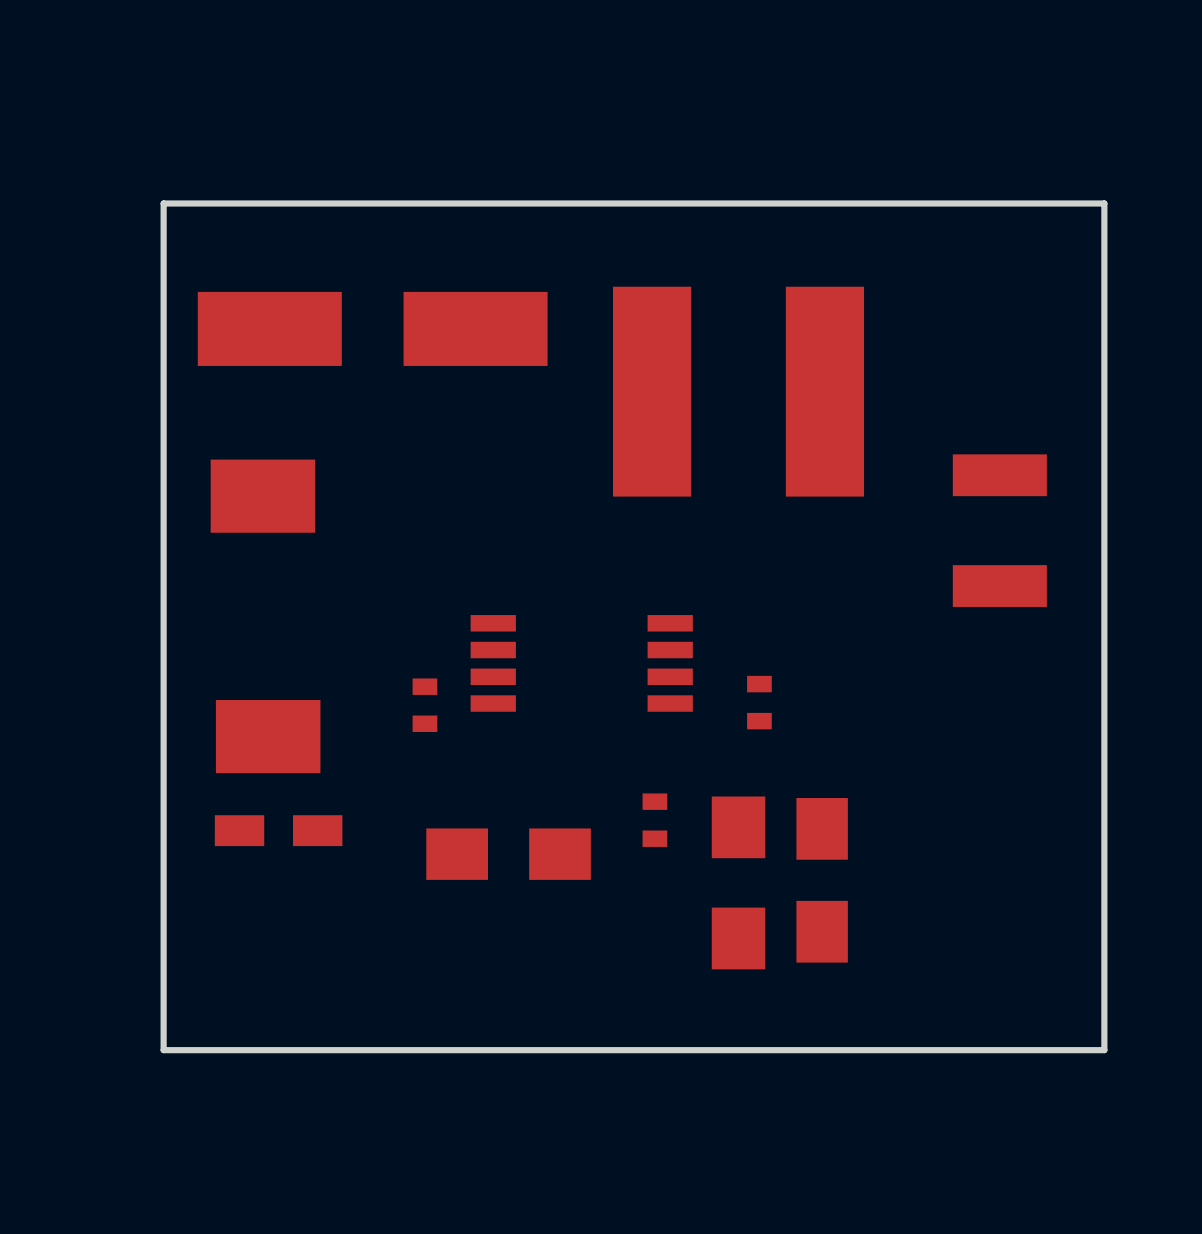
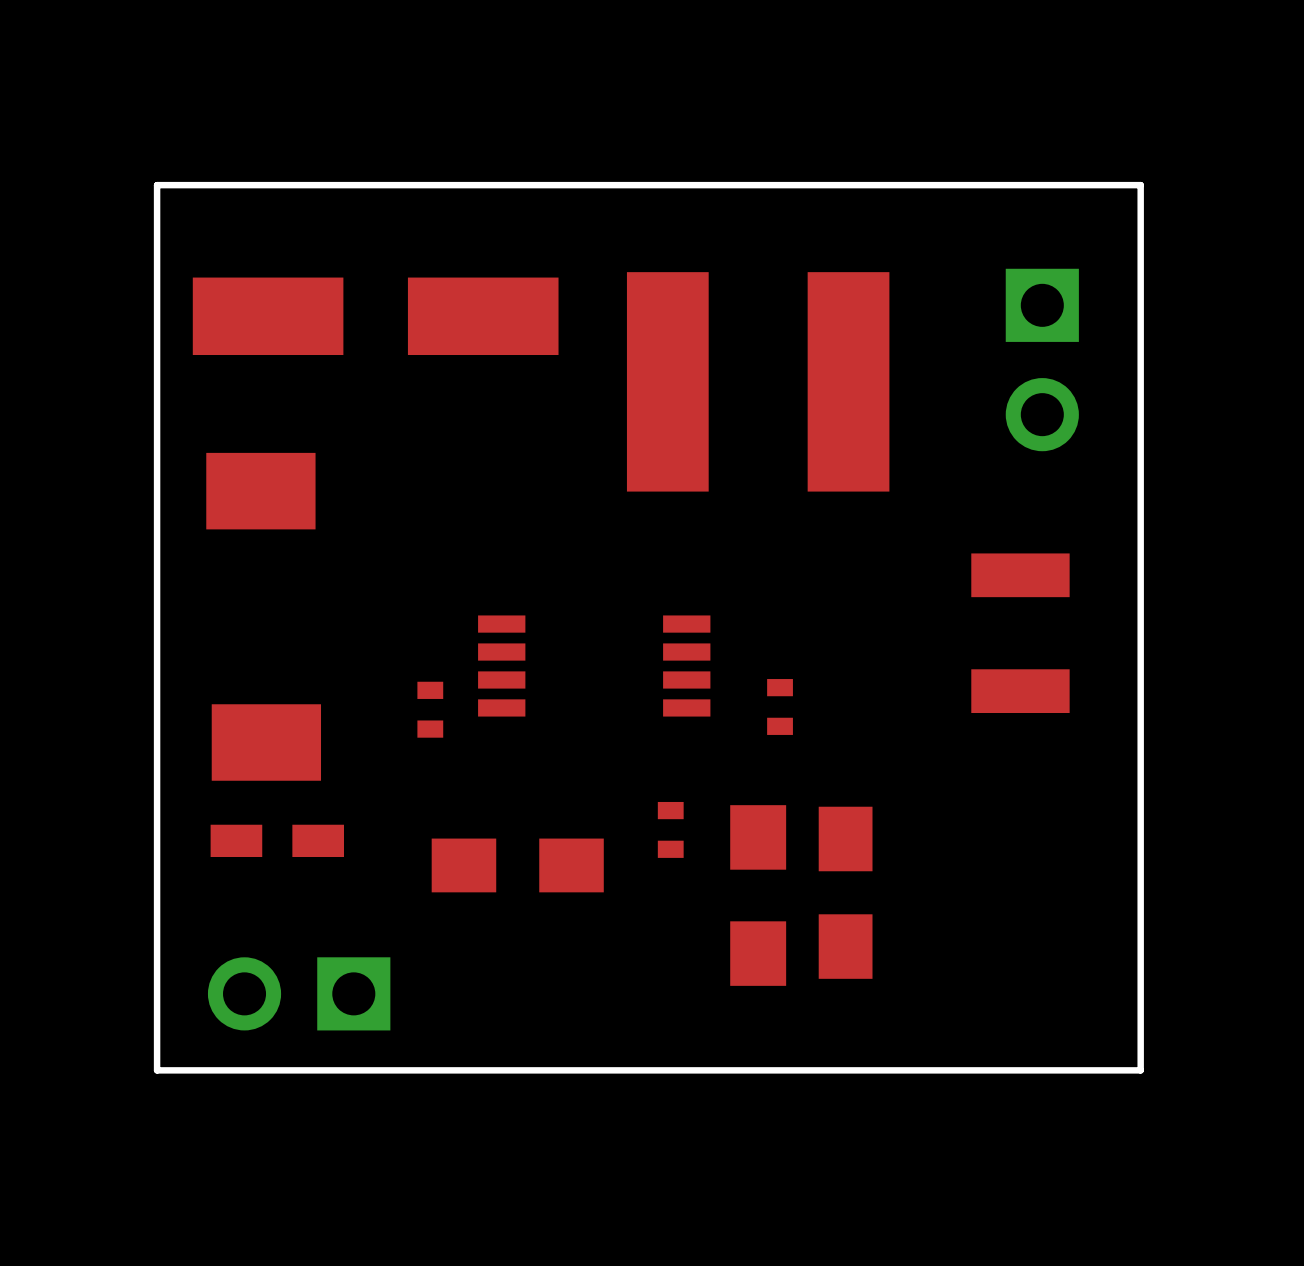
part: none -> (1042, 359)
part position: (999, 530) -> (1020, 633)
part: none -> (299, 993)

